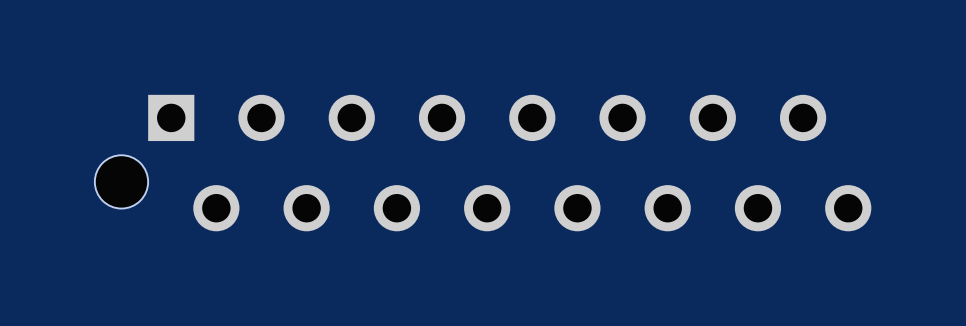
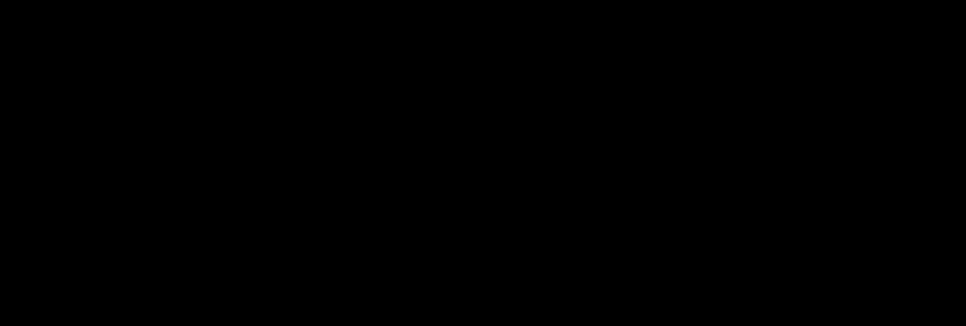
part: (483, 163) -> none

